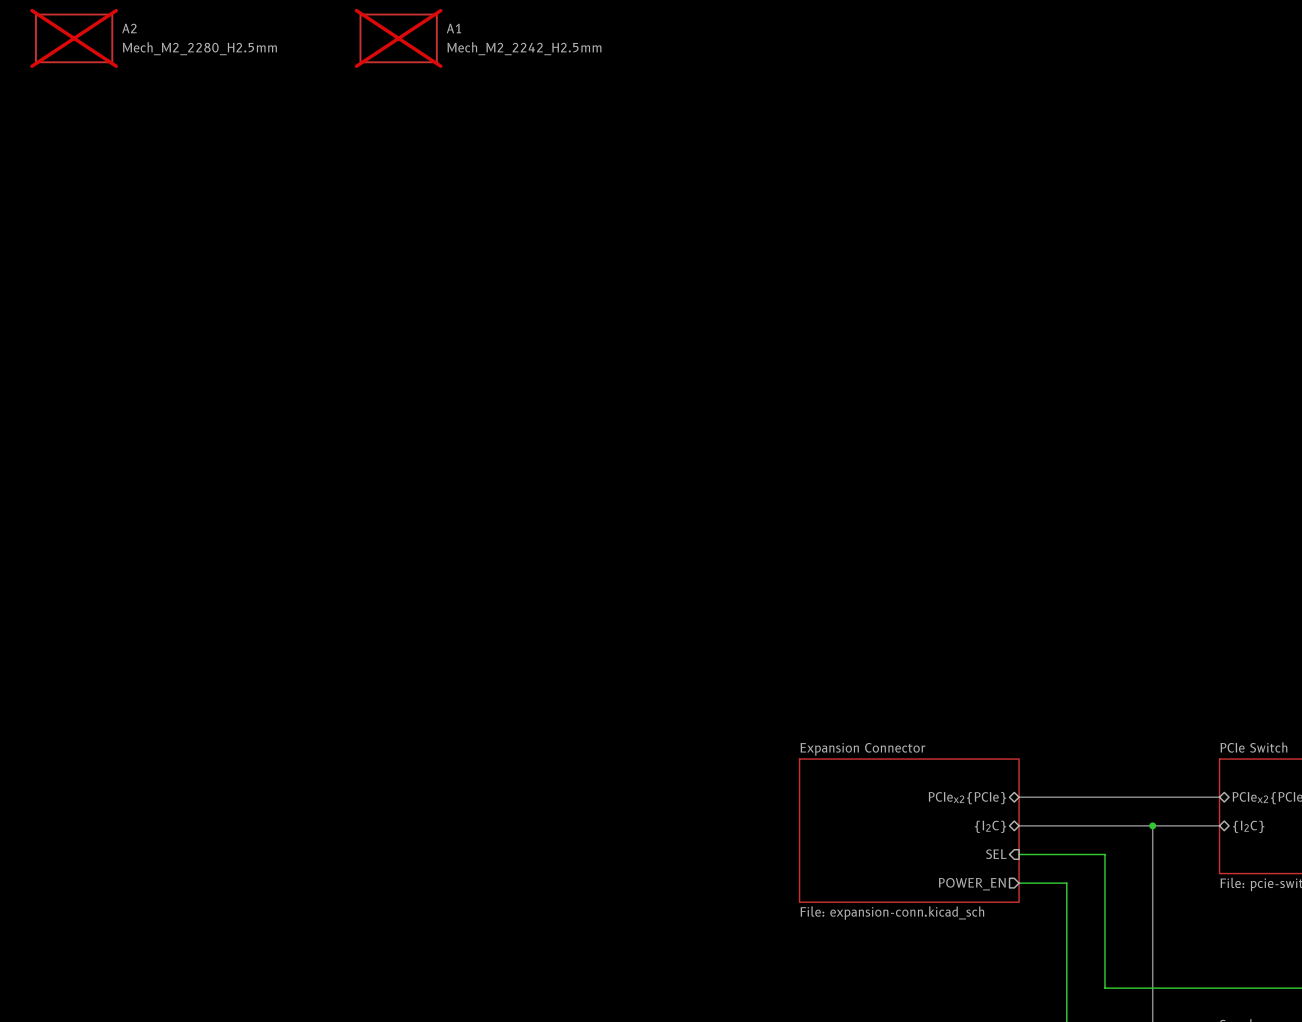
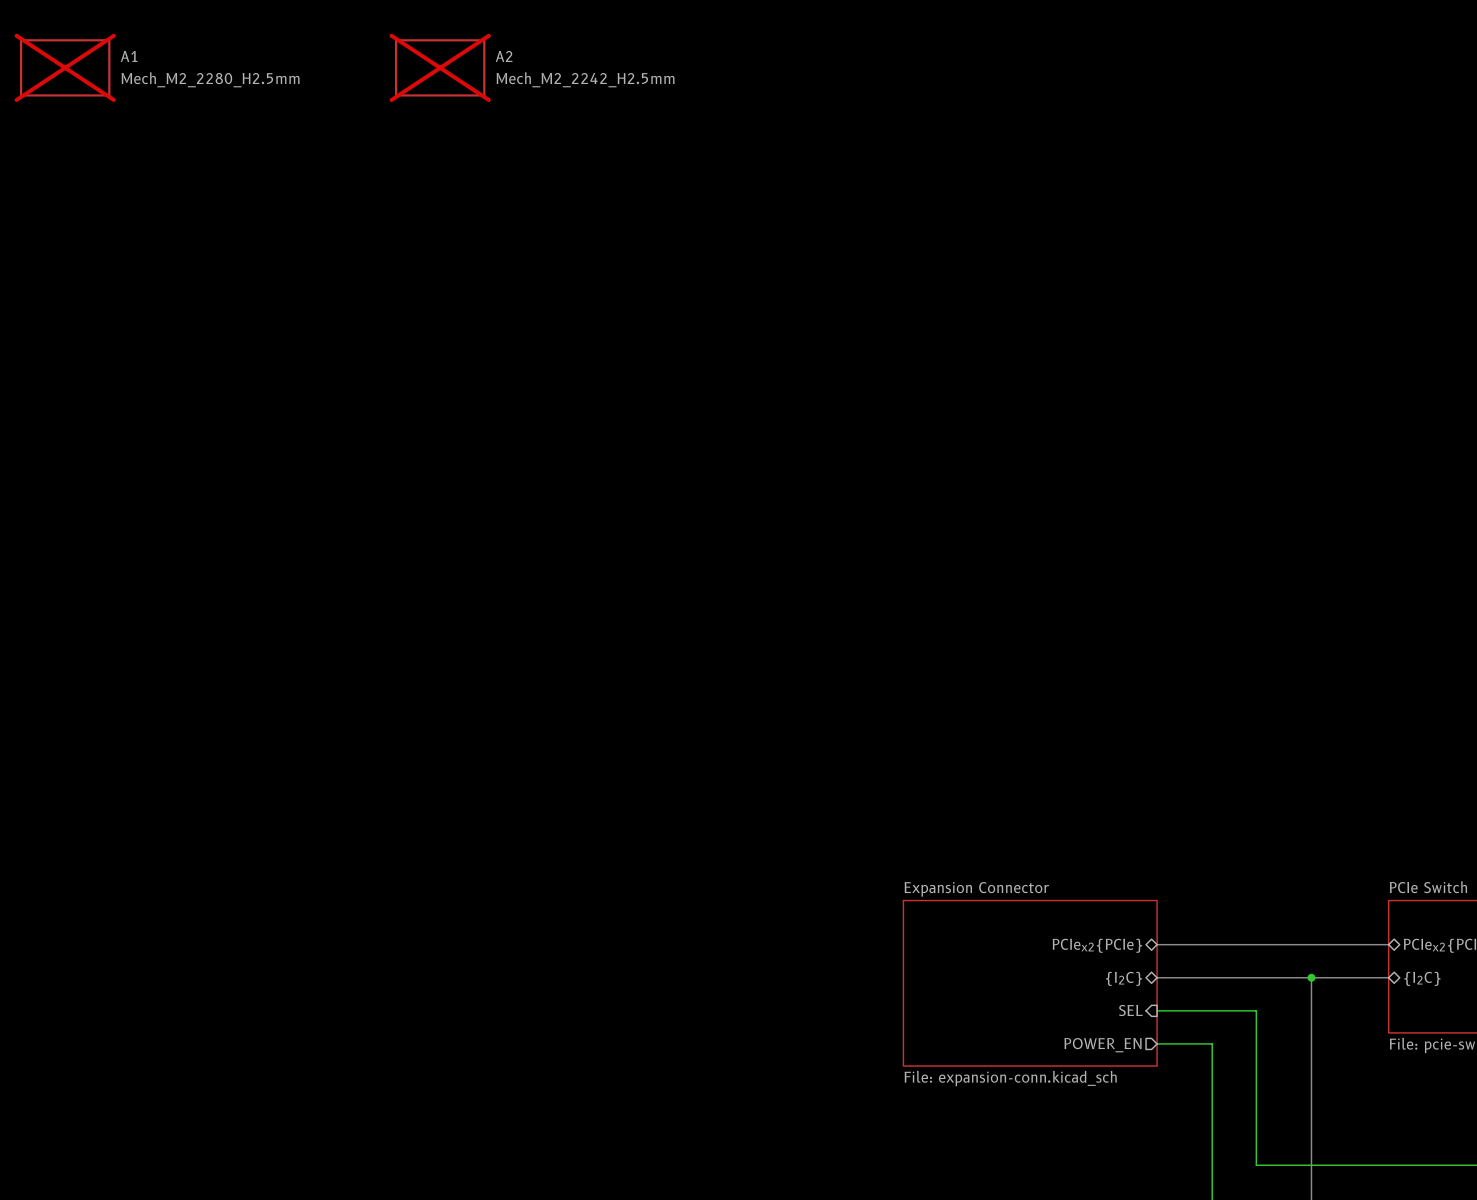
A2 name: A2 (129, 28) -> A1 (129, 56)
A1 name: A1 (453, 28) -> A2 (504, 56)

